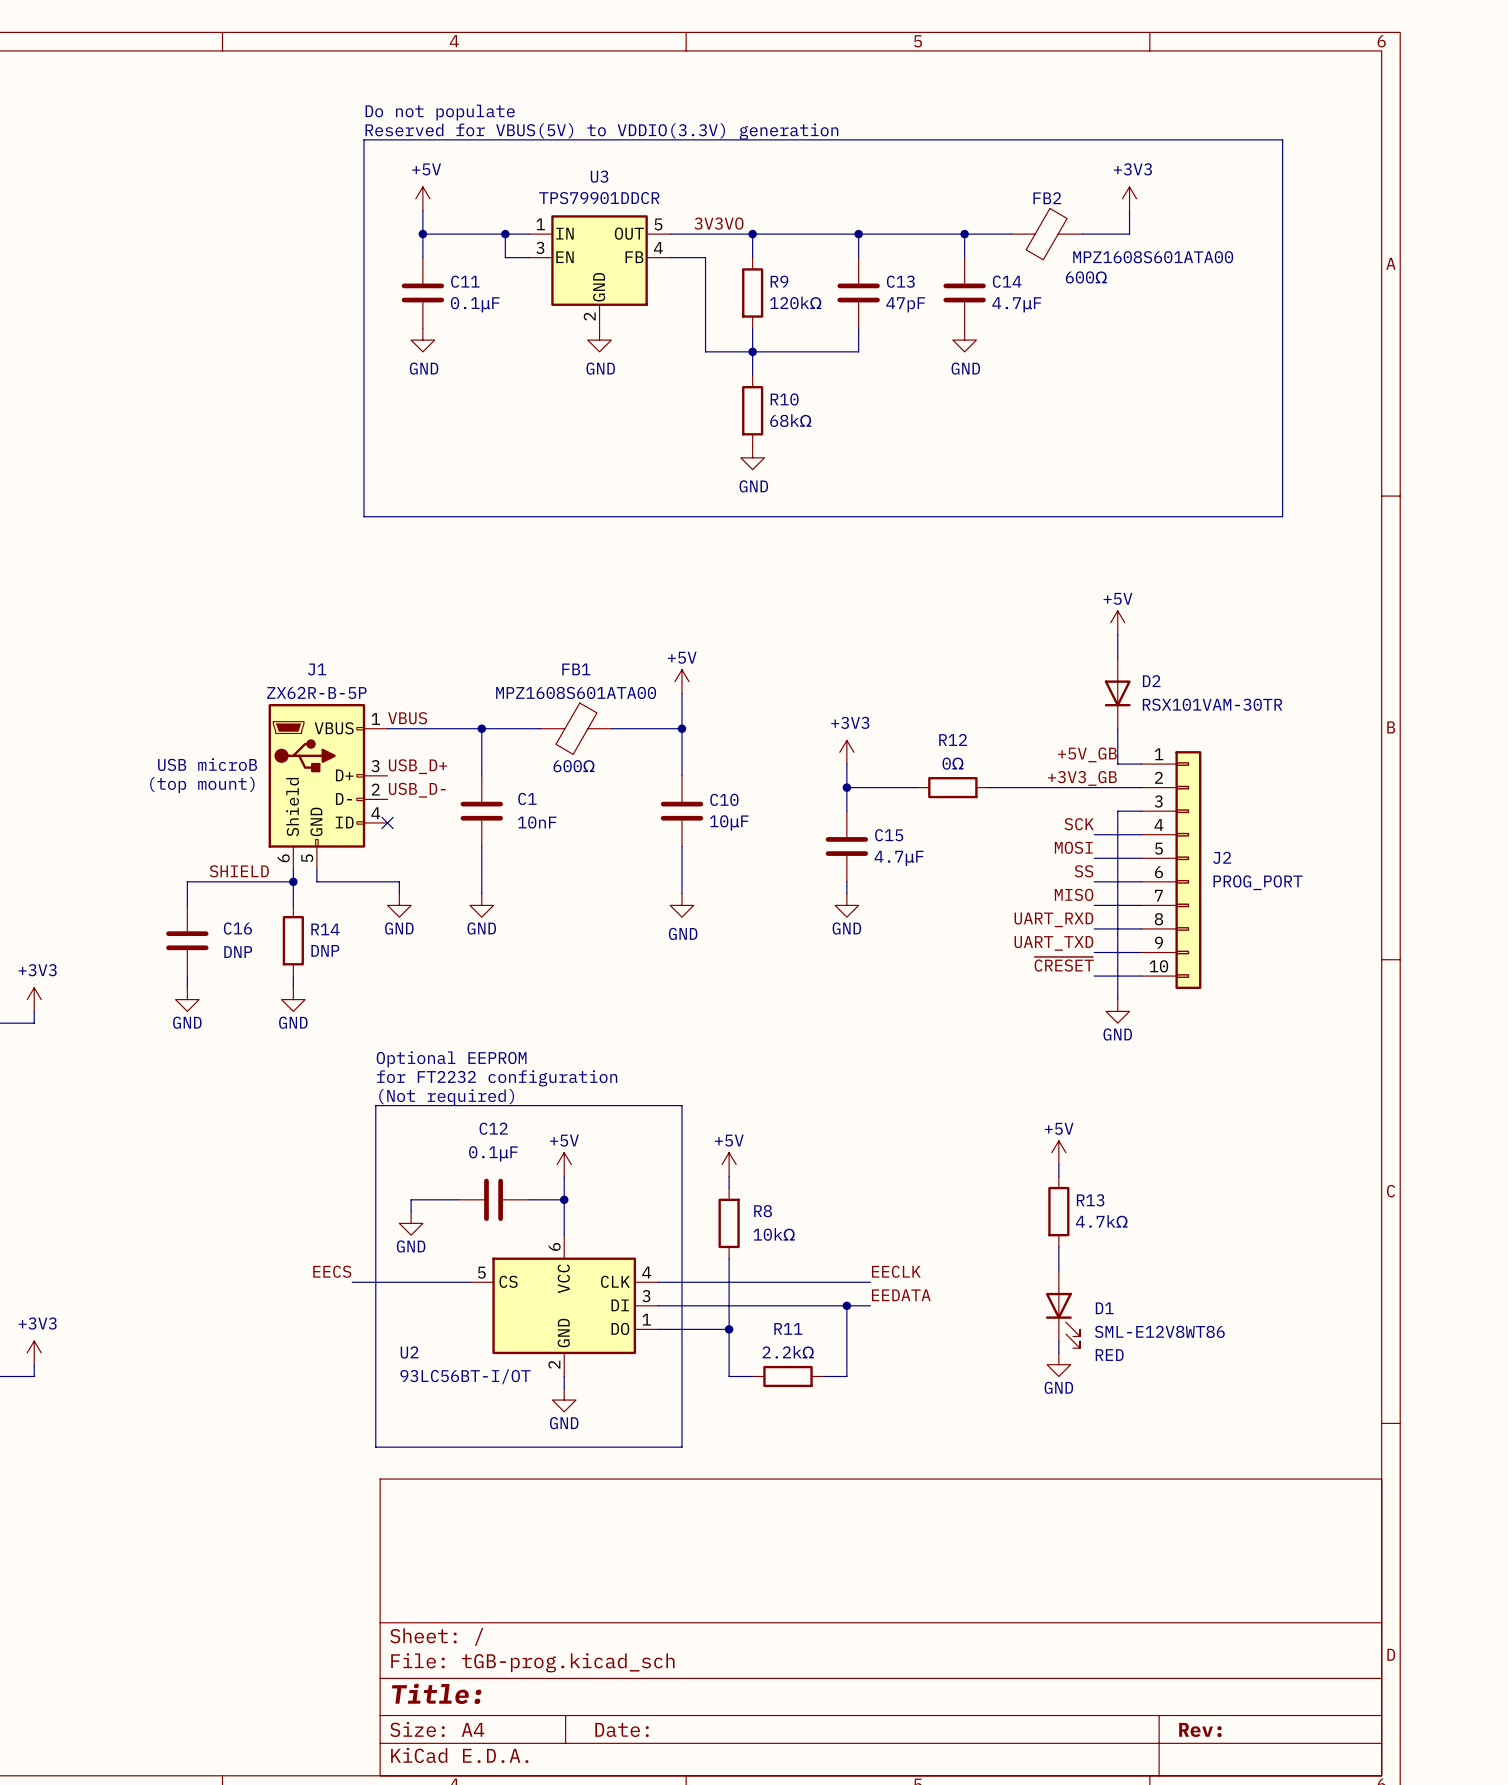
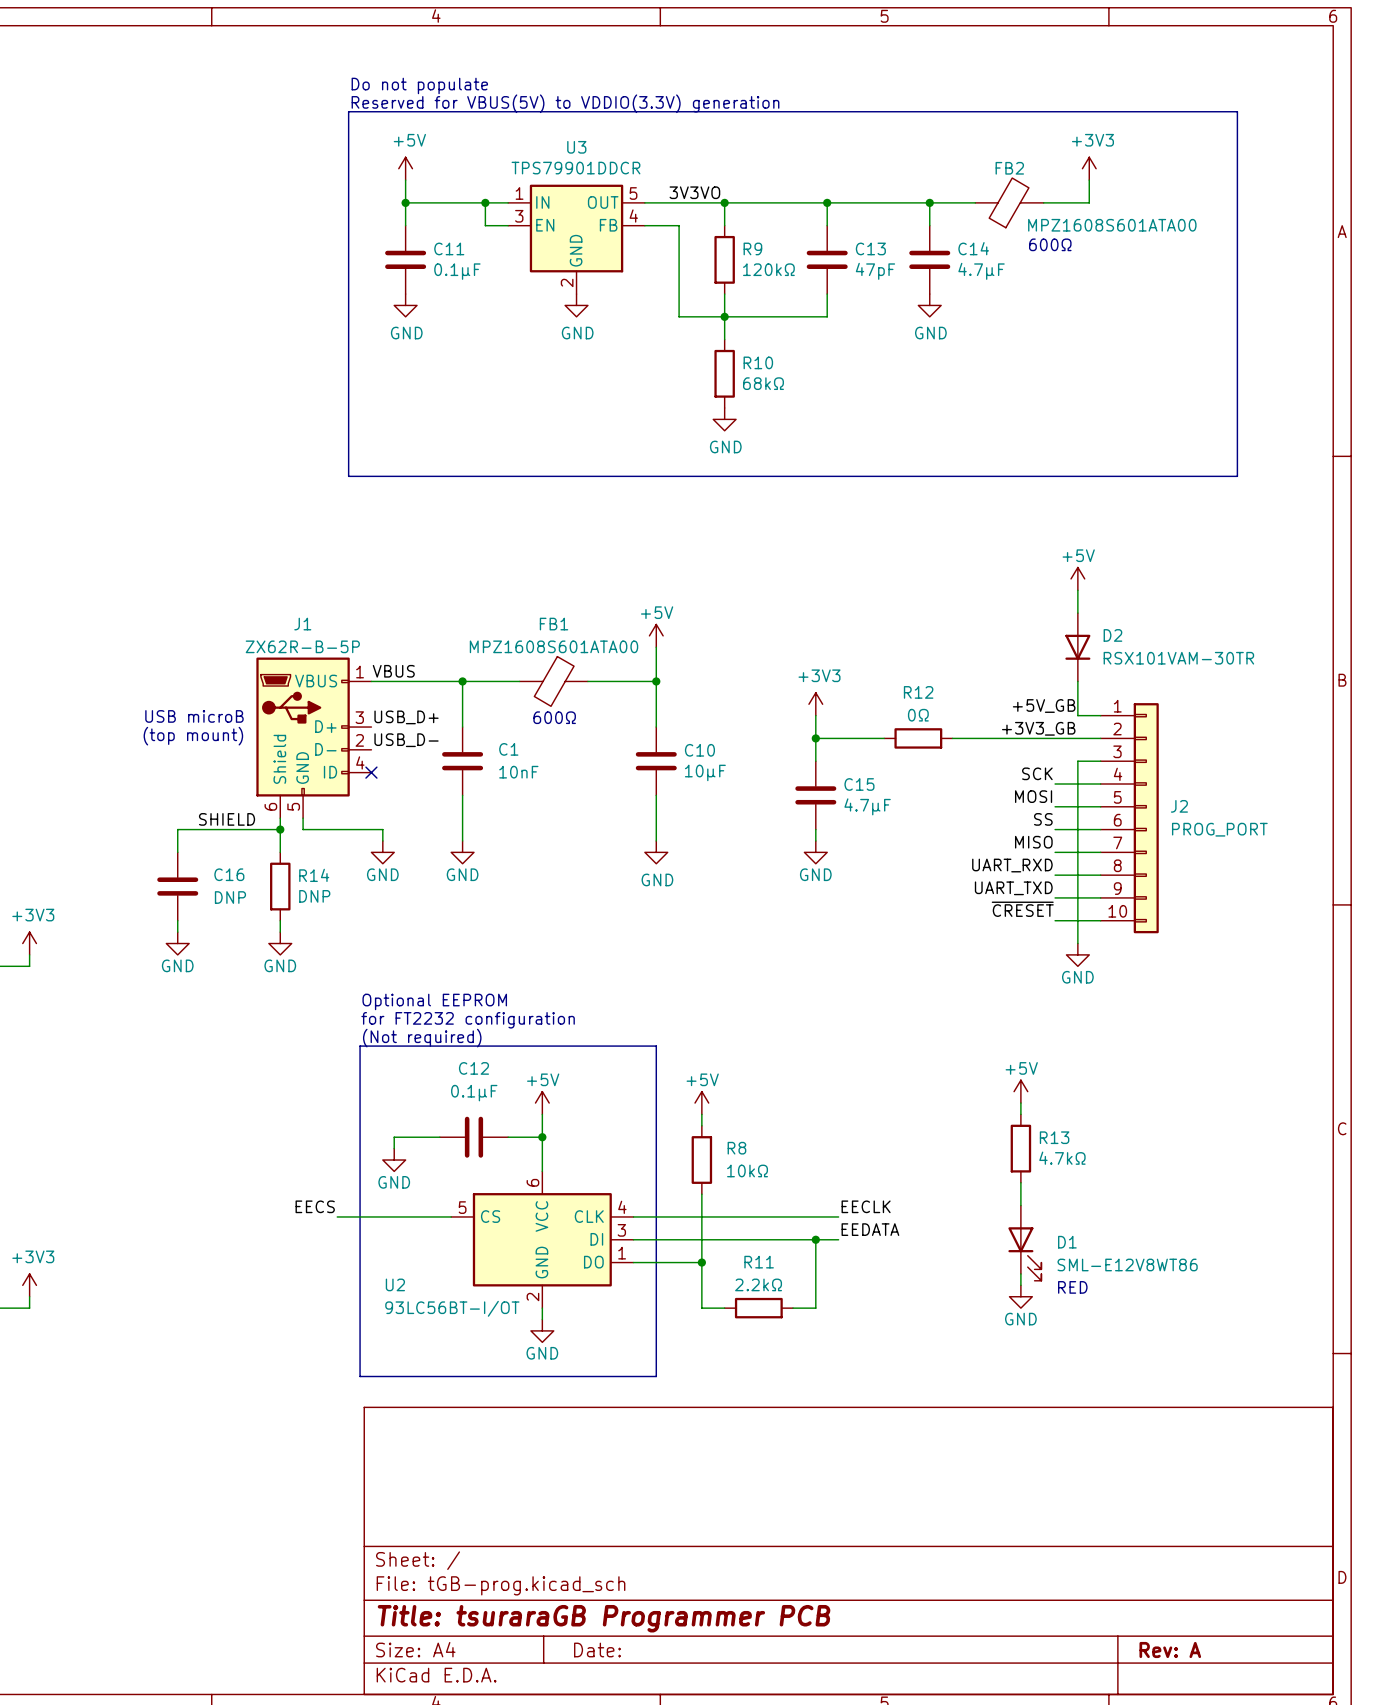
title block: Title: (436, 1693) -> Title: tsuraraGB Programmer PCB (604, 1618)
title block: Rev: (1200, 1729) -> Rev: A (1170, 1650)

